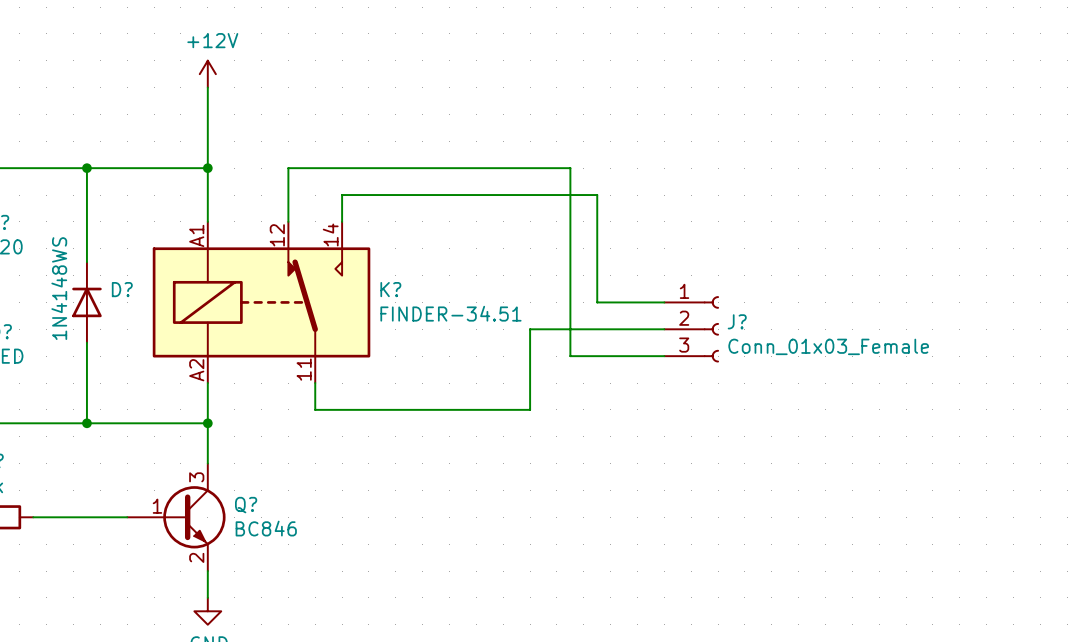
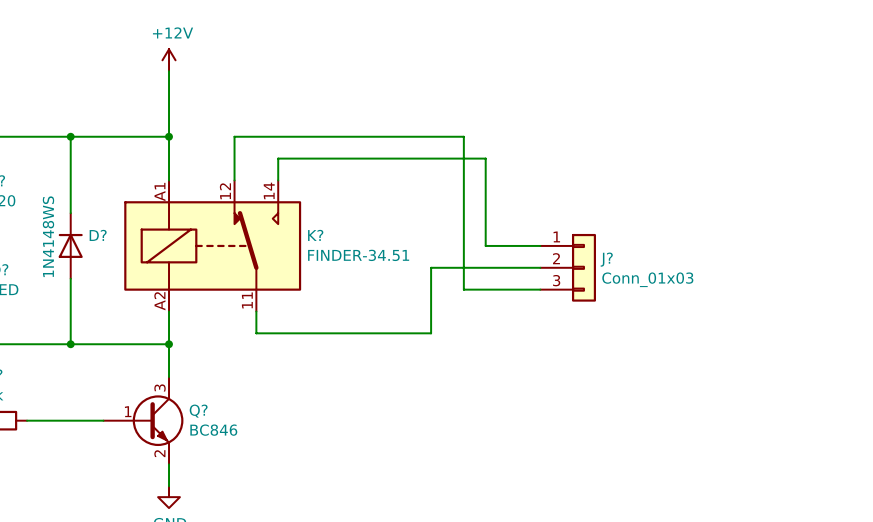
J? symbol: [664, 296, 719, 363] -> [540, 233, 597, 302]
J? value: Conn_01x03_Female (828, 346) -> Conn_01x03 (647, 279)

